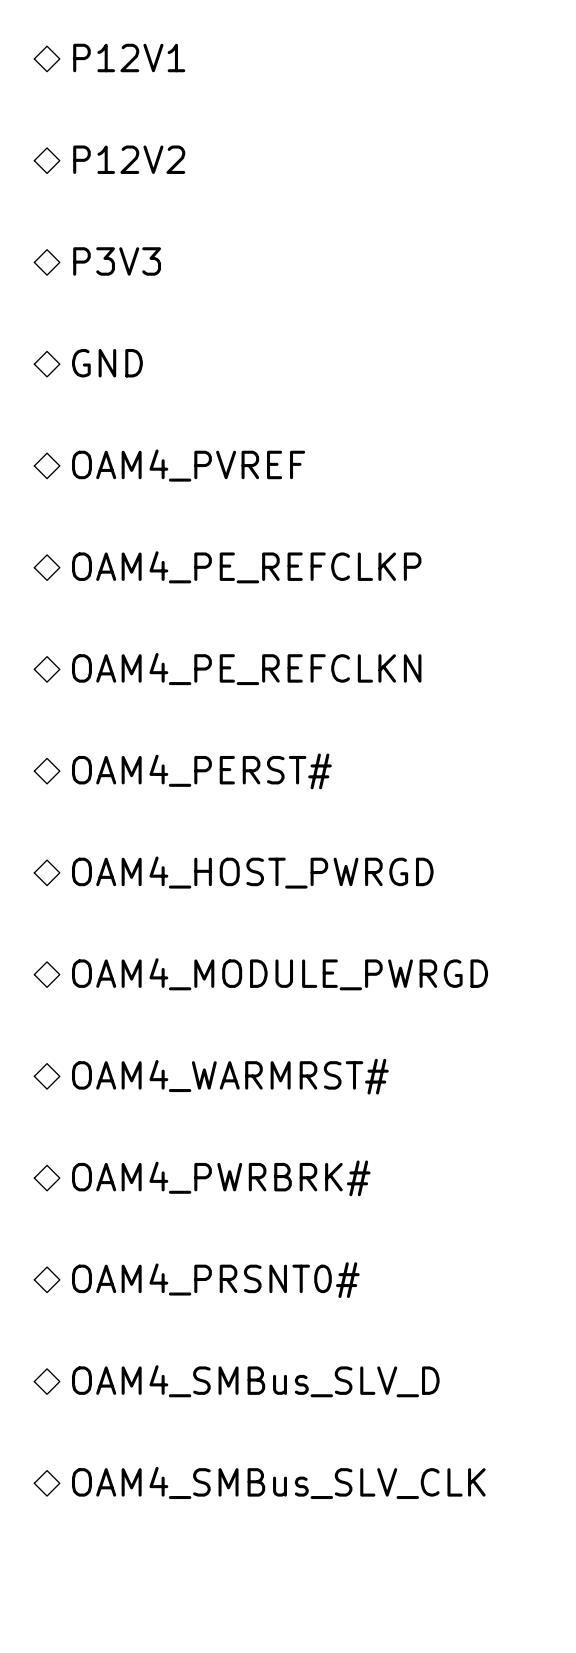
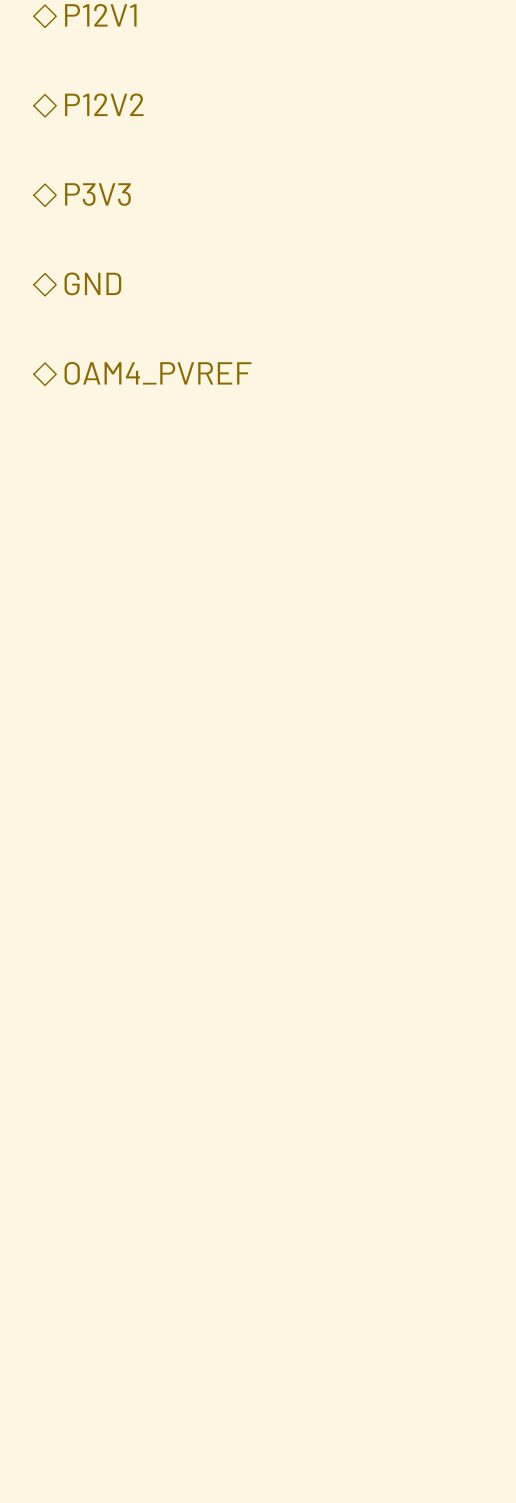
hierarchical label: OAM4_PE_REFCLKP (246, 567) -> none
hierarchical label: OAM4_PE_REFCLKN (246, 669) -> none
hierarchical label: OAM4_PERST# (201, 771) -> none
hierarchical label: OAM4_HOST_PWRGD (252, 872) -> none
hierarchical label: OAM4_MODULE_PWRGD (280, 974) -> none
hierarchical label: OAM4_WARMRST# (230, 1076) -> none
hierarchical label: OAM4_PWRBRK# (221, 1178) -> none
hierarchical label: OAM4_PRSNT0# (215, 1280) -> none
hierarchical label: OAM4_SMBus_SLV_D (255, 1381) -> none
hierarchical label: OAM4_SMBus_SLV_CLK (278, 1482) -> none

